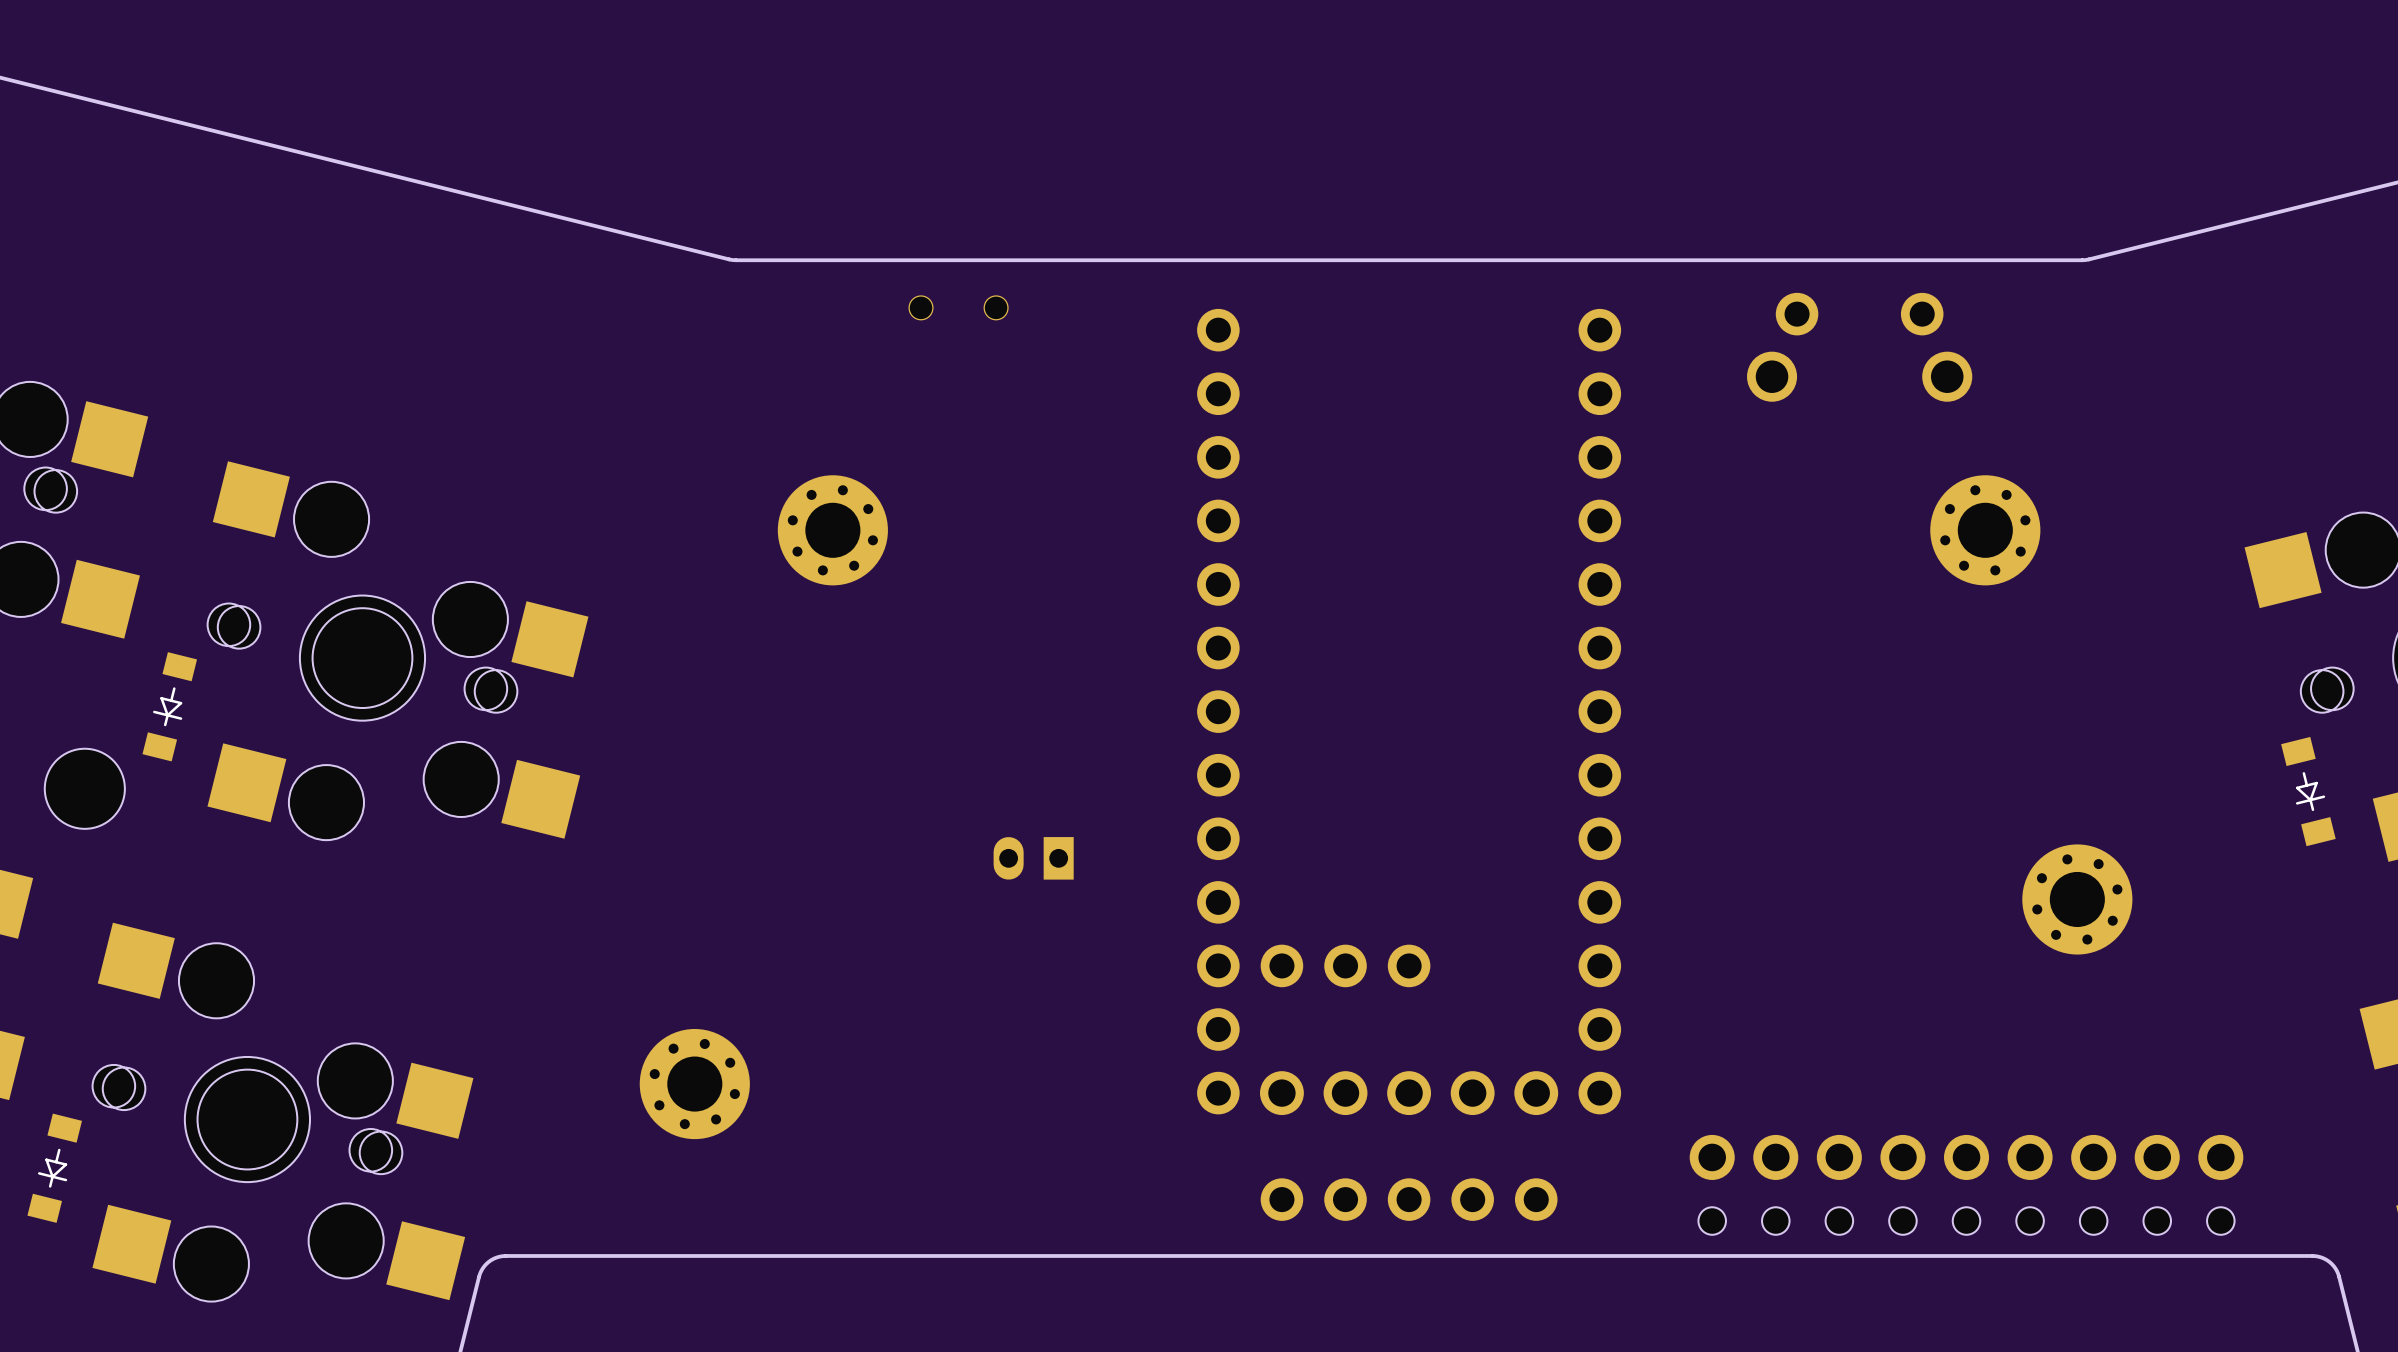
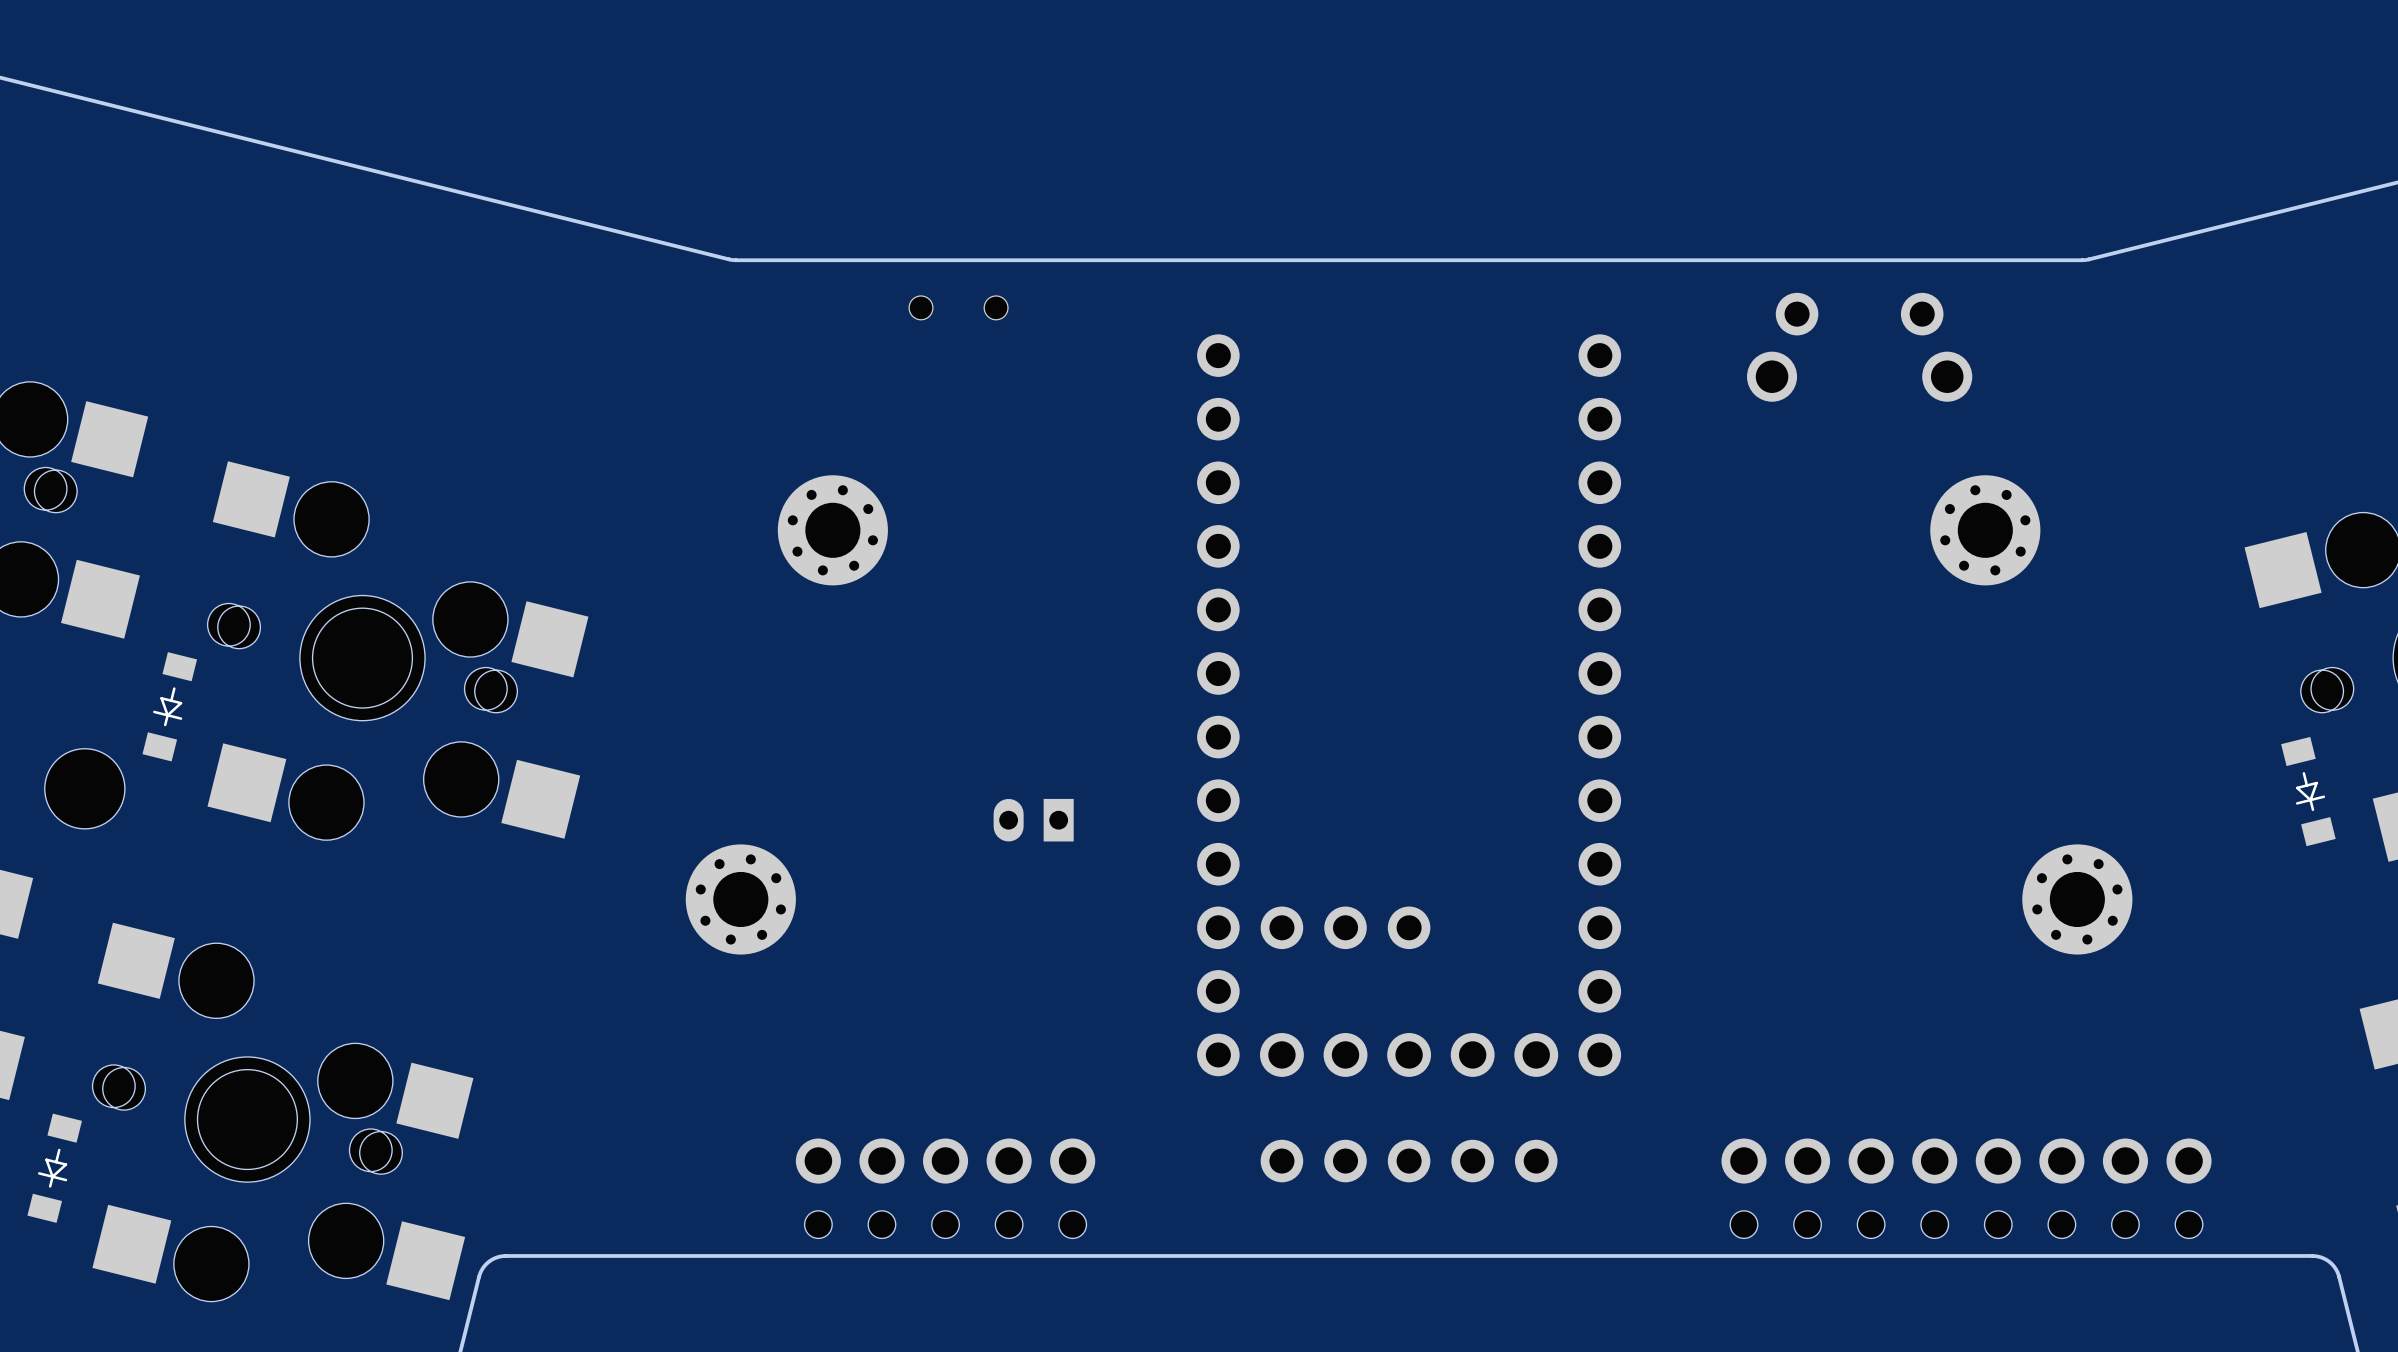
part footprint: [1197, 308, 1622, 1116] -> [1197, 334, 1622, 1077]
part position: (1033, 858) -> (1033, 820)
part position: (694, 1084) -> (740, 899)
part footprint: [1689, 1134, 2244, 1235] -> [1721, 1138, 2212, 1239]
part: none -> (945, 1188)
part position: (1409, 1199) -> (1409, 1161)

